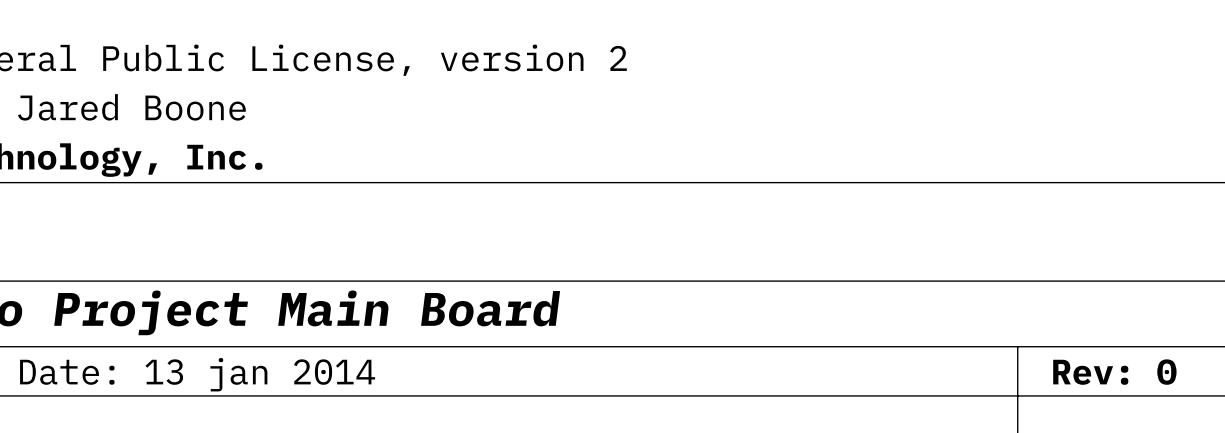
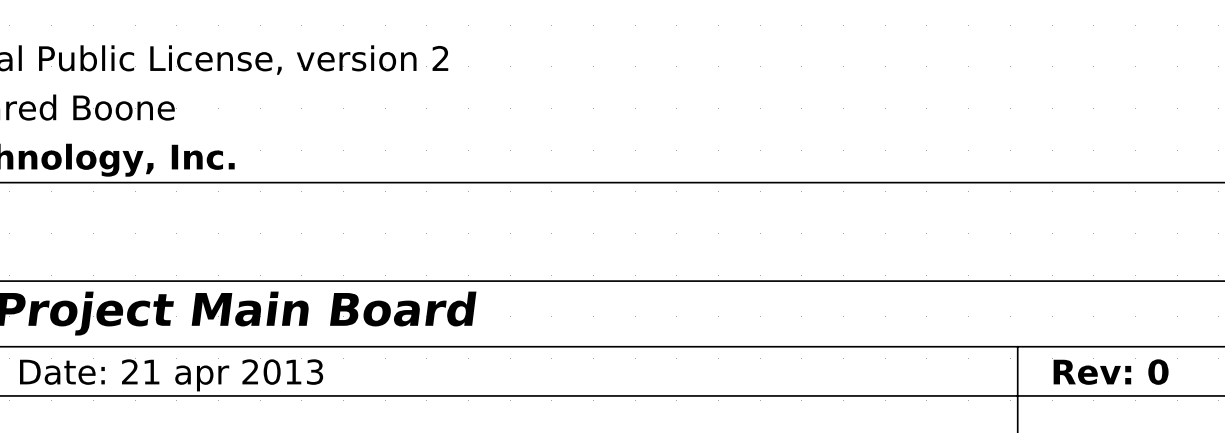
title block: Date: 13 jan 2014 (197, 374) -> Date: 21 apr 2013 (171, 375)

